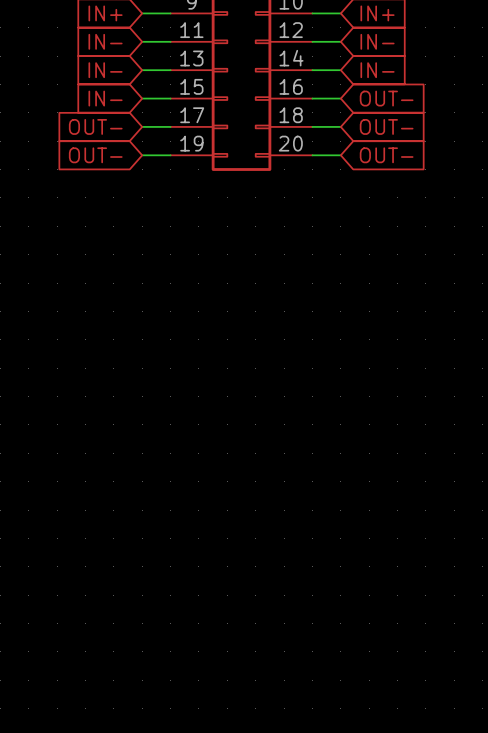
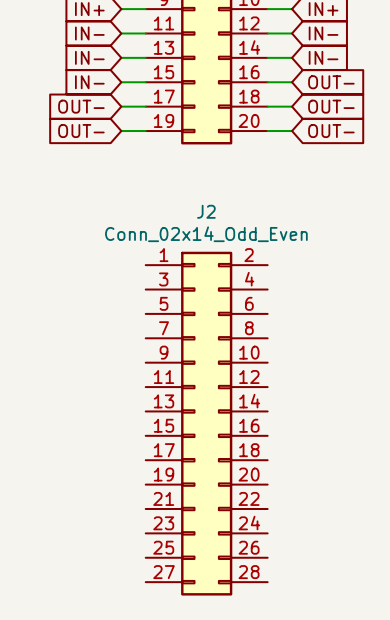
J2: none -> Conn_02x14_Odd_Even (206, 423)

